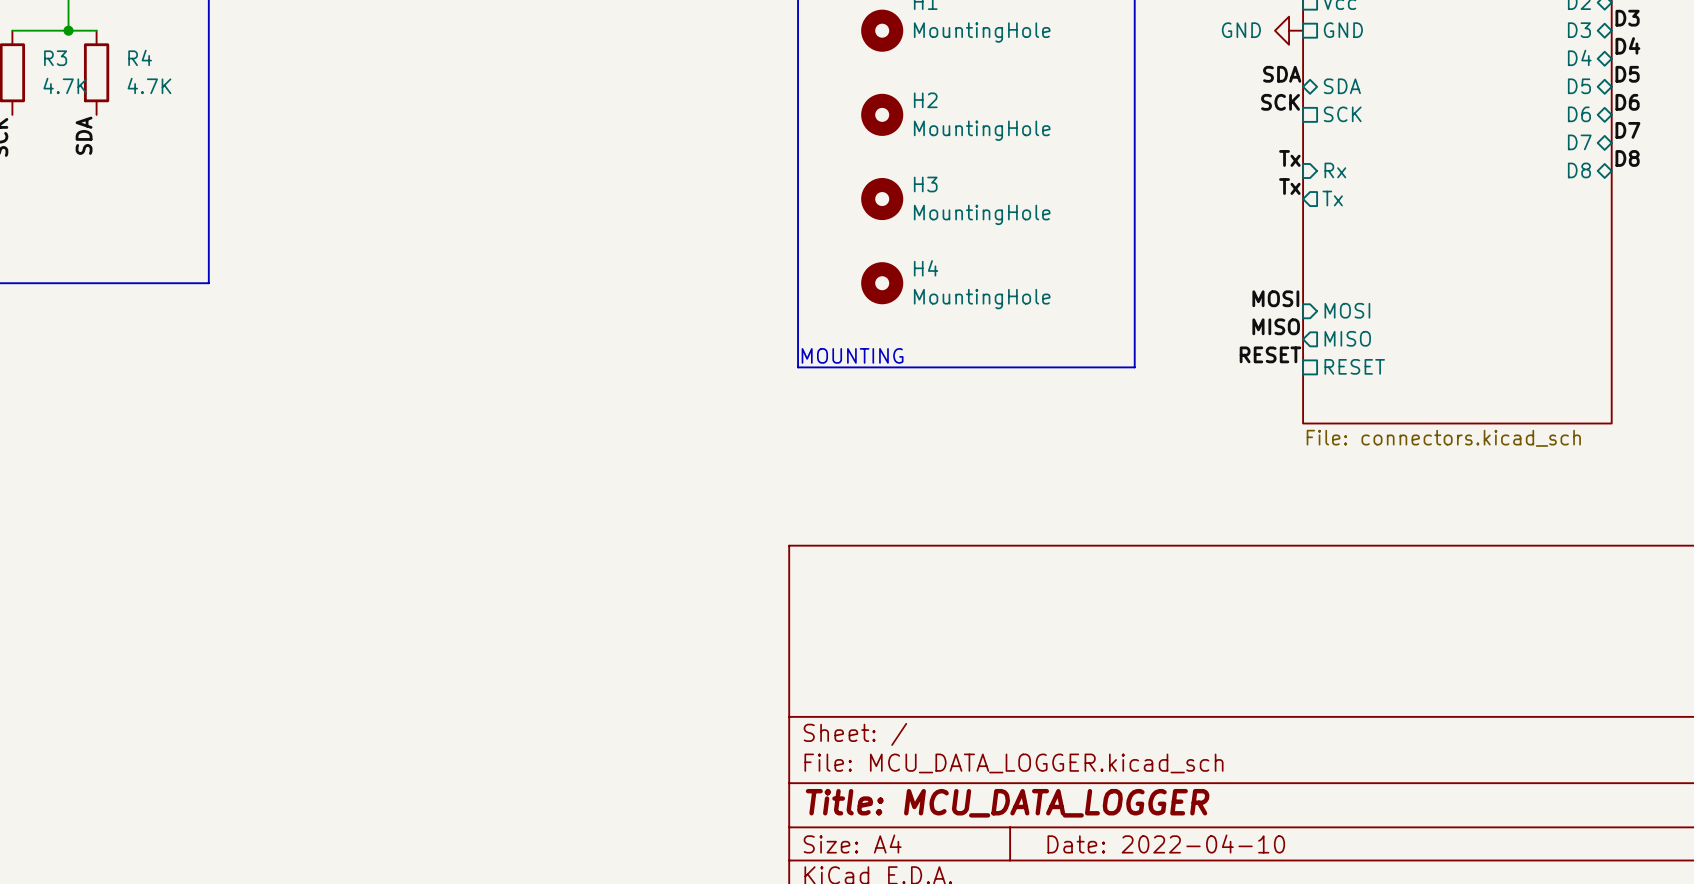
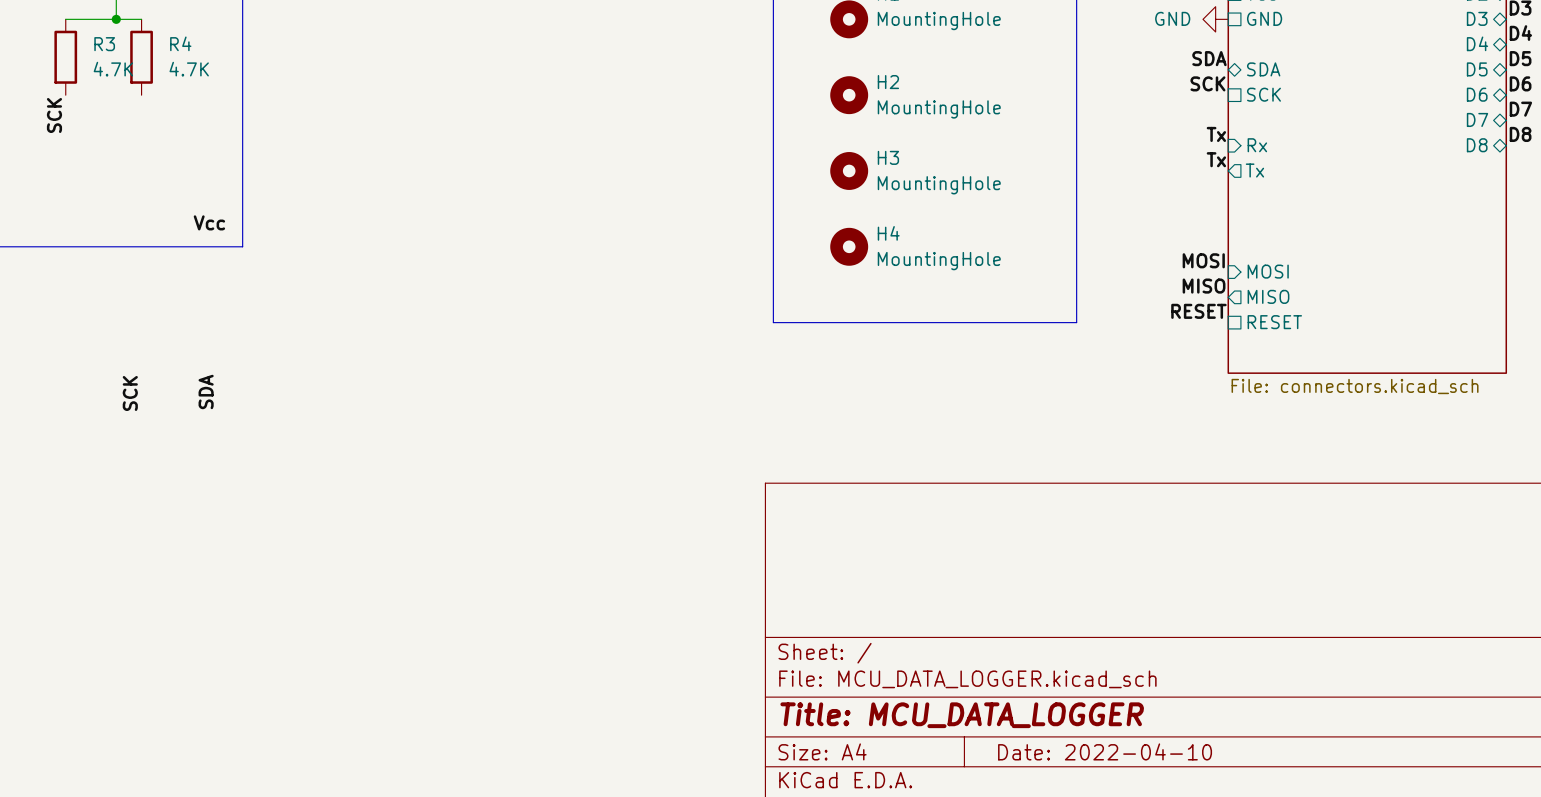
label: SDA (84, 135) -> none
label: none -> Vcc (209, 222)
text: MOUNTING (852, 355) -> none
label: none -> SDA (206, 391)
label: none -> SCK (130, 393)

